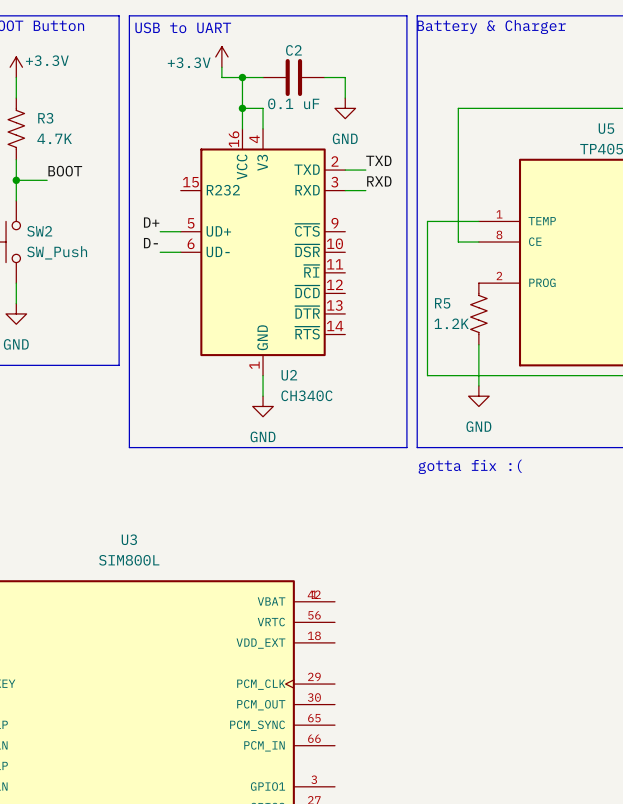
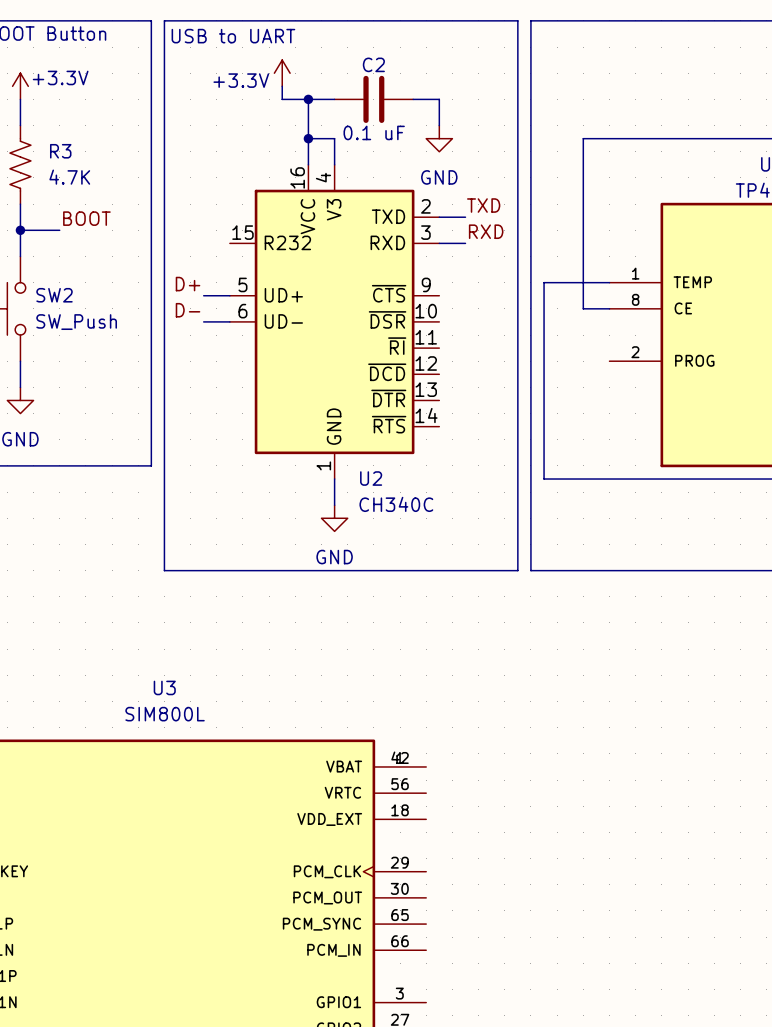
text: Battery & Charger (491, 27) -> none
R5: 1.2K (478, 313) -> none
wire: (478, 344) (478, 385) -> none
power symbol: GND (478, 396) -> none
text: gotta fix :( (470, 466) -> none

